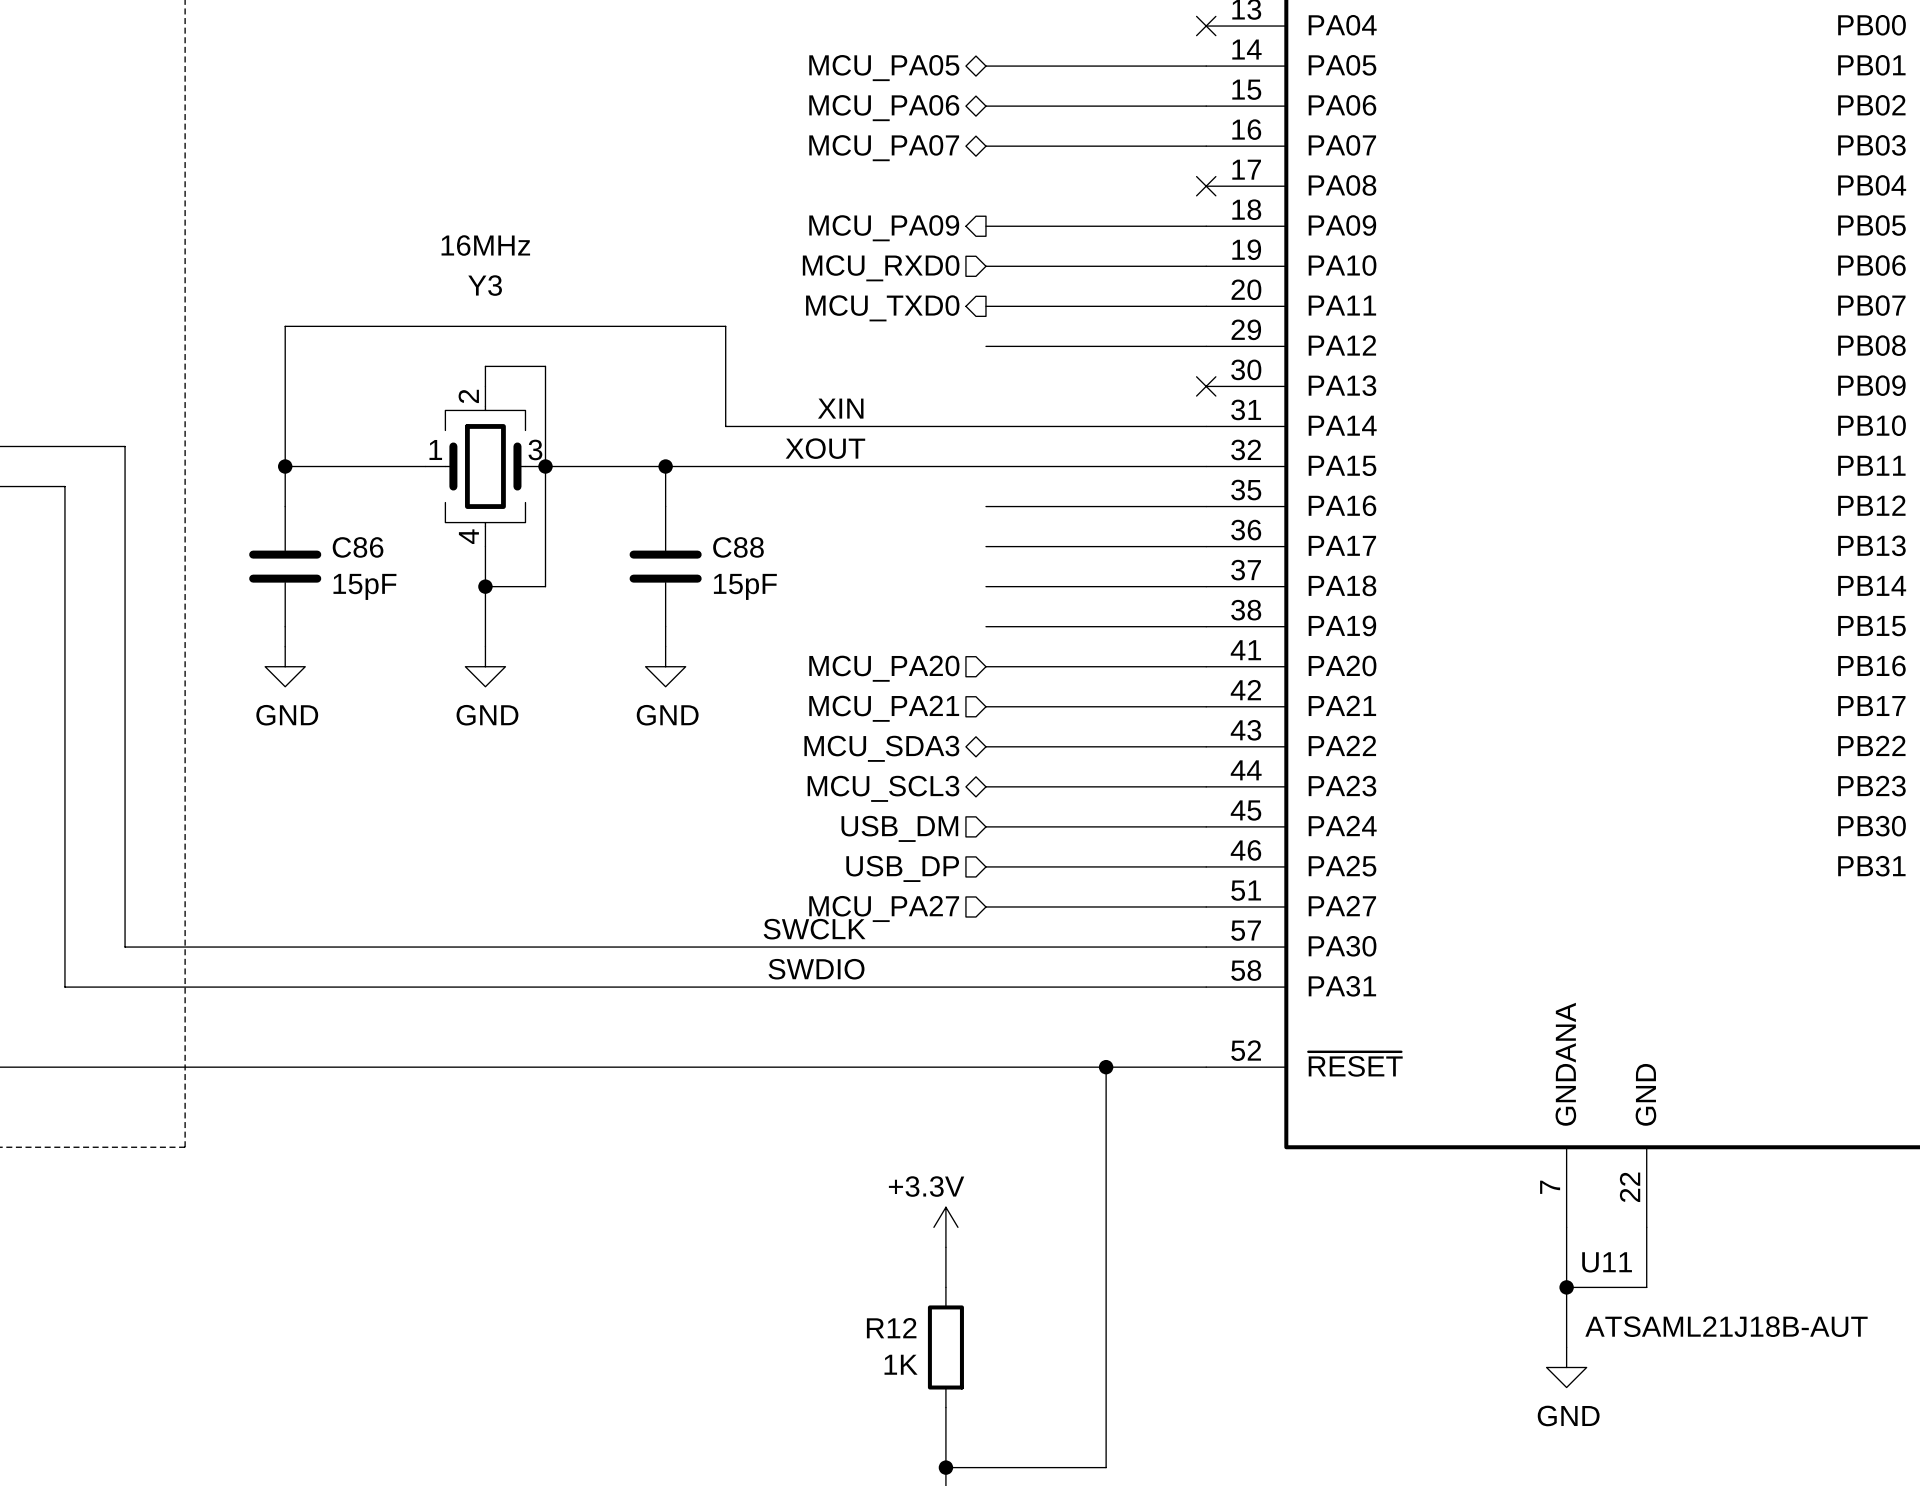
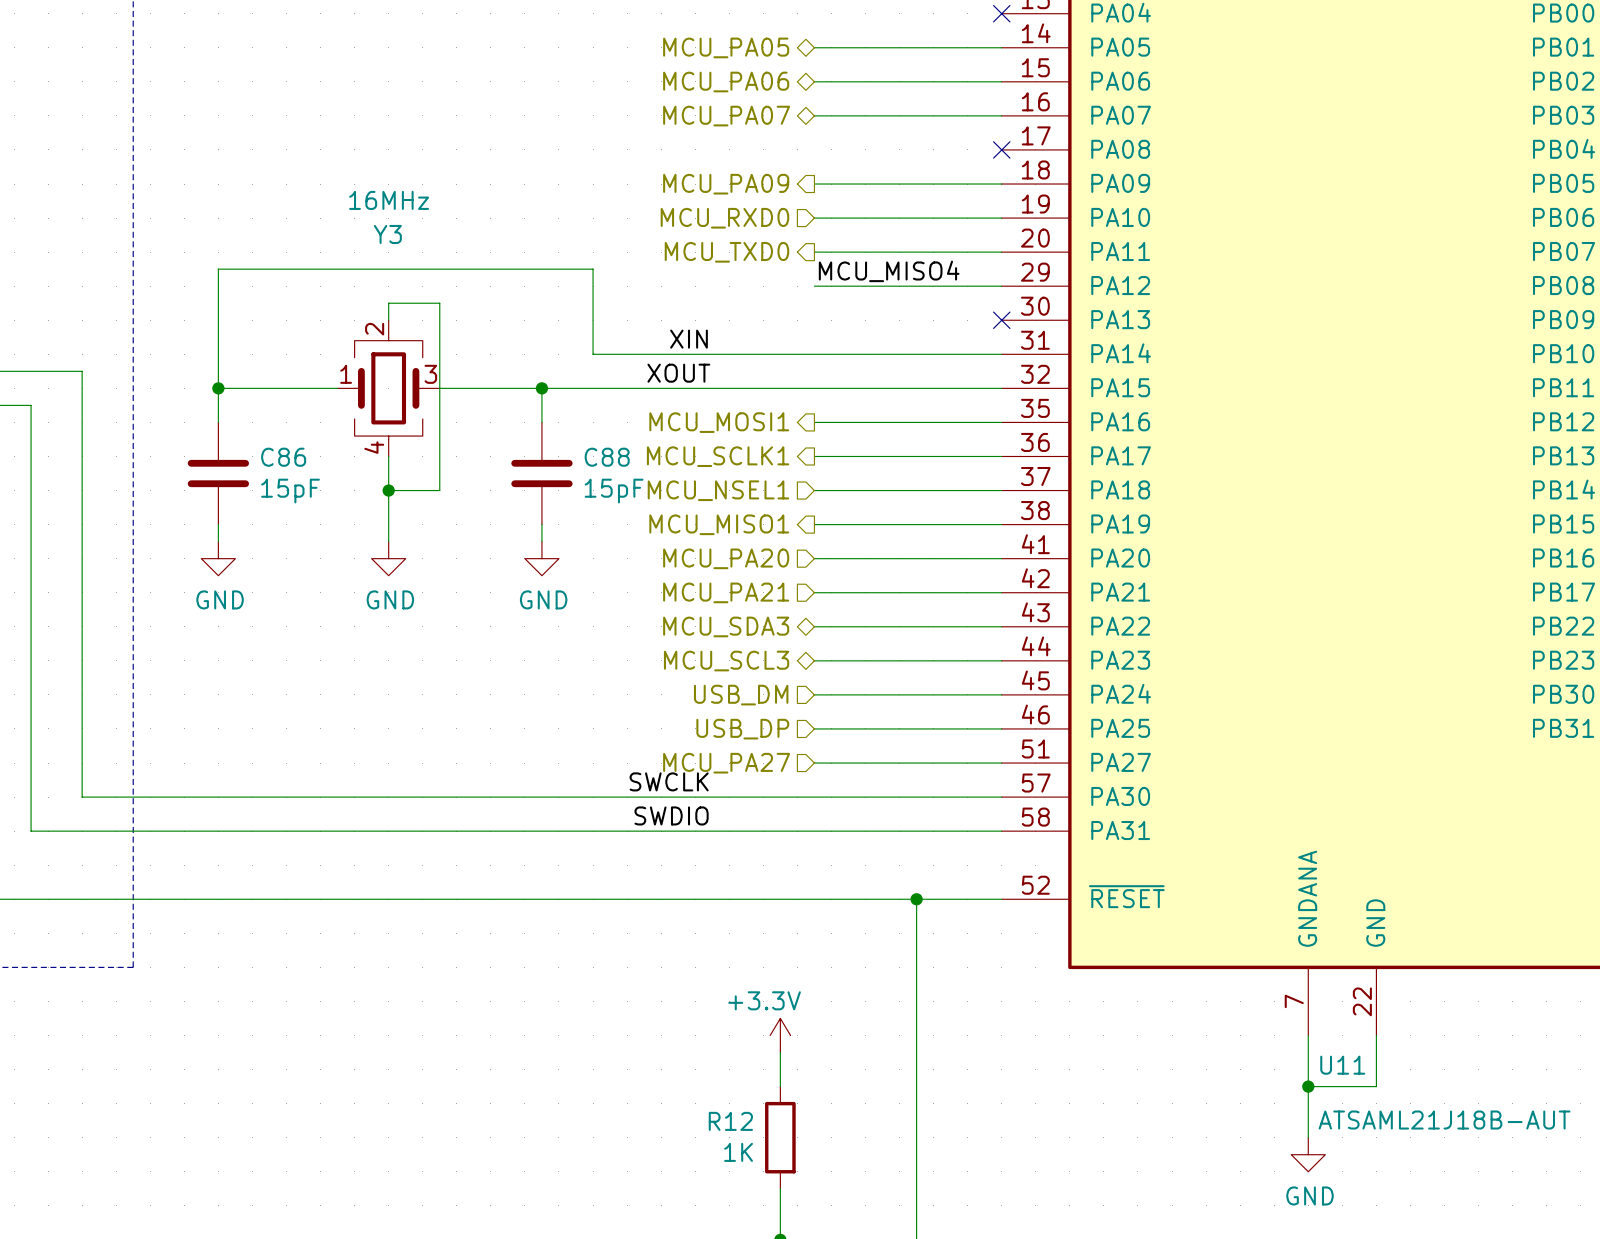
label: none -> MCU_MISO4 (889, 271)
junction: (545, 466) -> none
hierarchical label: none -> MCU_MOSI1 (719, 422)
hierarchical label: none -> MCU_SCLK1 (718, 456)
hierarchical label: none -> MCU_NSEL1 (718, 490)
hierarchical label: none -> MCU_MISO1 (719, 524)

